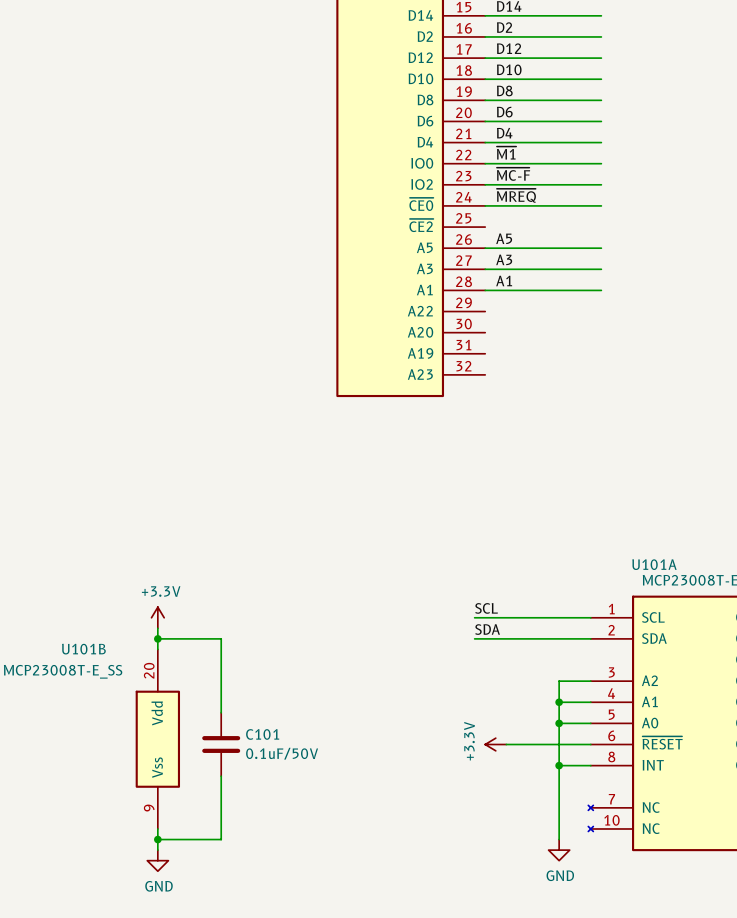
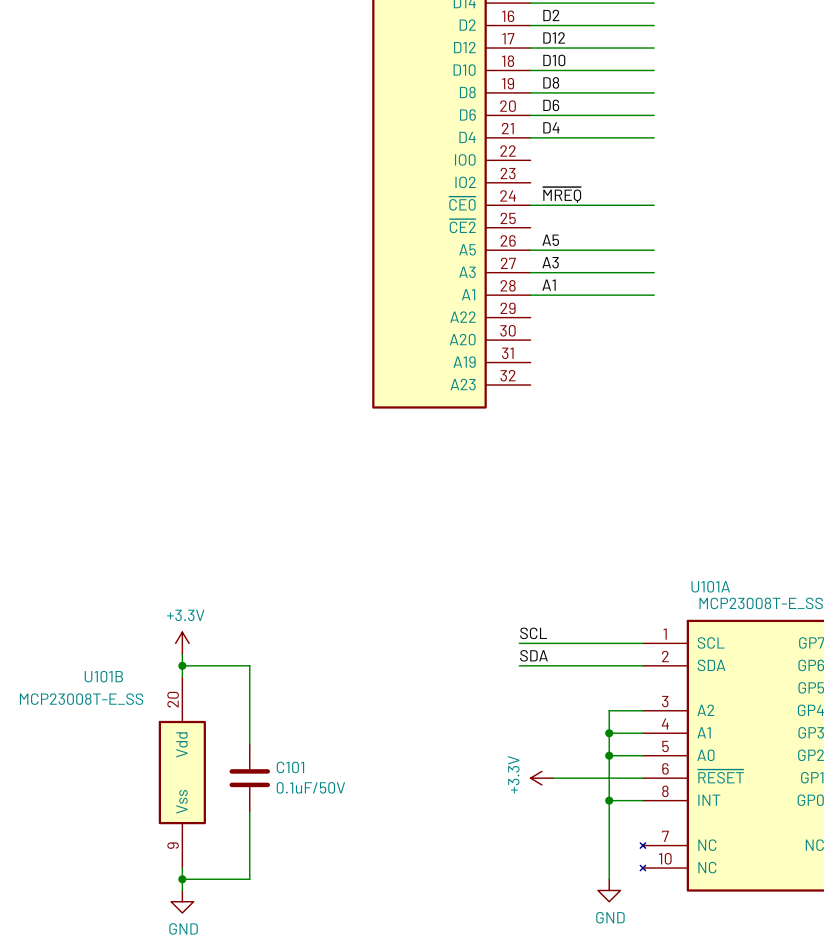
label: ~{M1} (506, 153) -> none
wire: (485, 163) (601, 163) -> none
label: ~{MC-F} (513, 174) -> none
wire: (485, 184) (601, 184) -> none

